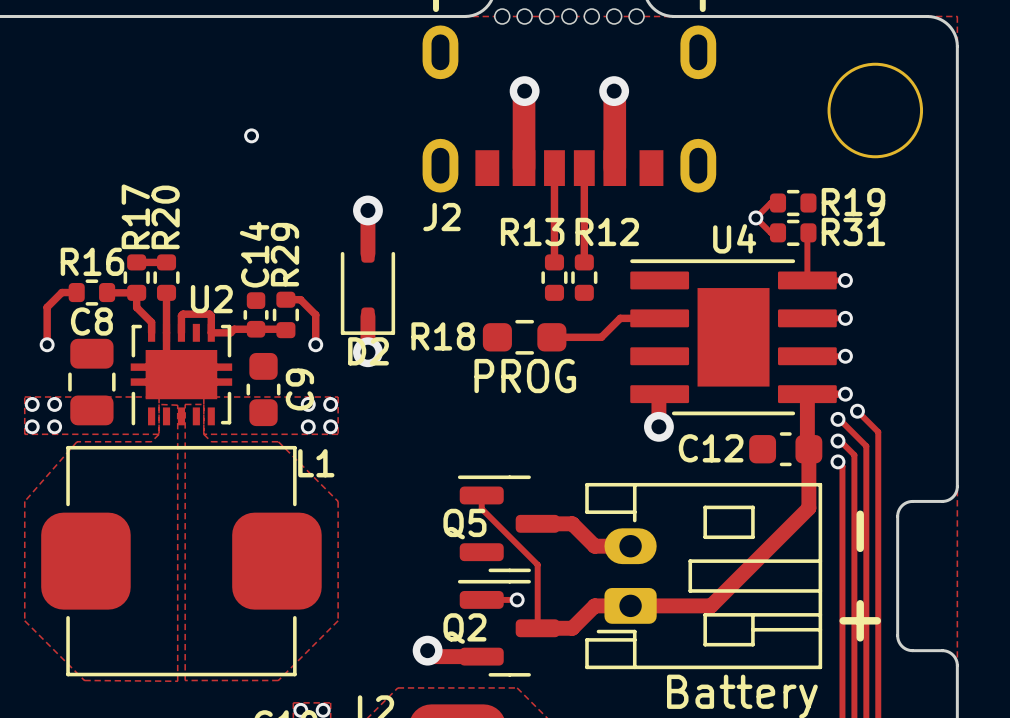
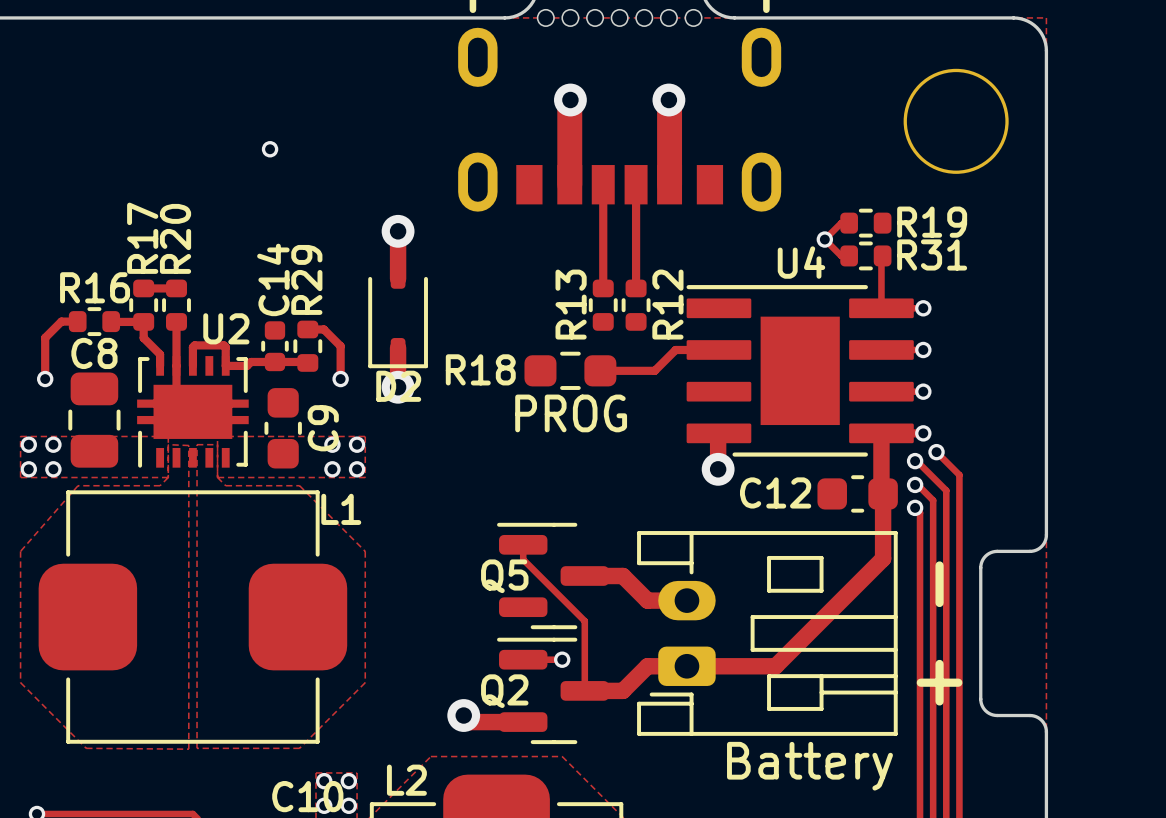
J2 name: J2 (441, 217) -> none
R13 name rotation: 0° (532, 231) -> 90° counterclockwise (571, 304)
R12 name rotation: 0° (607, 231) -> 90° counterclockwise (667, 304)

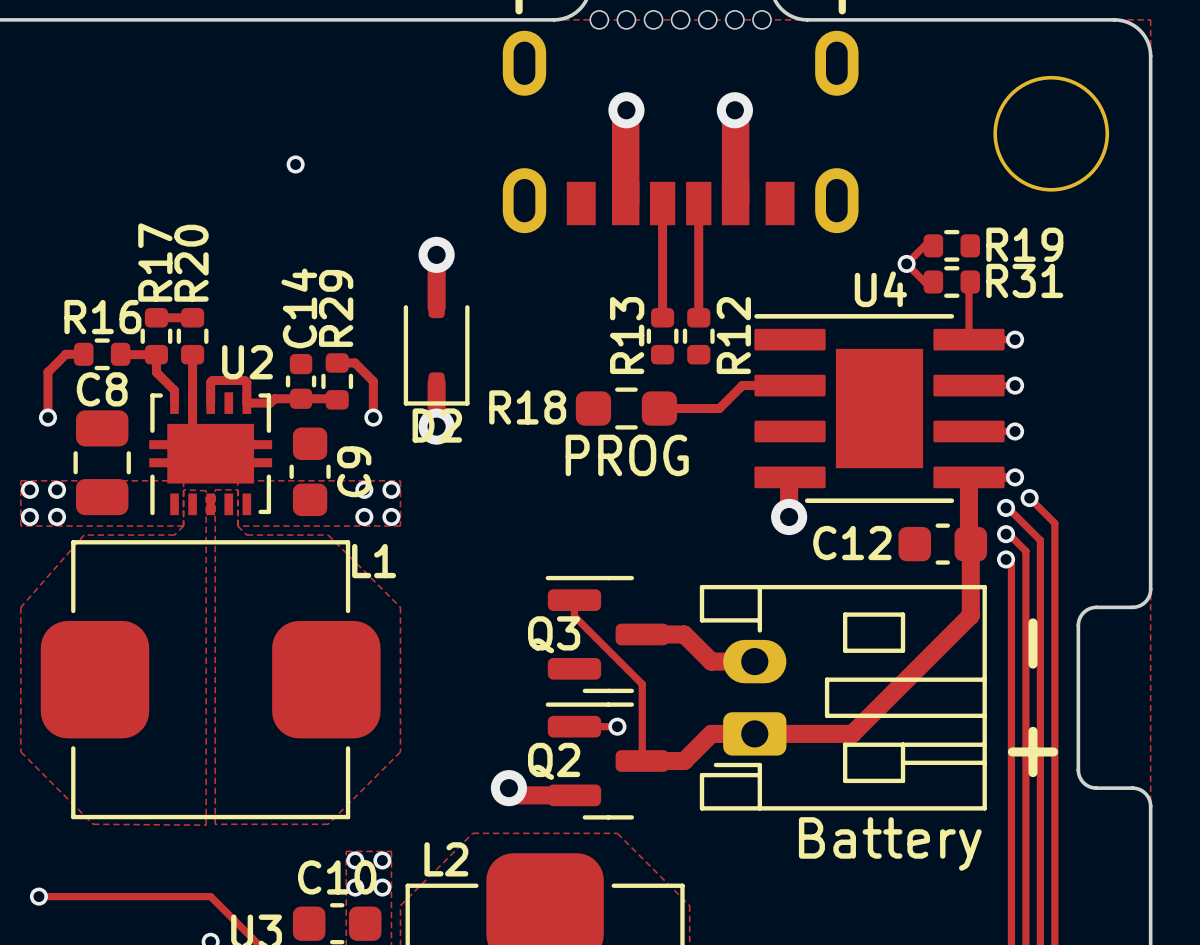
Q5 name: Q5 (504, 576) -> Q3 (554, 634)

